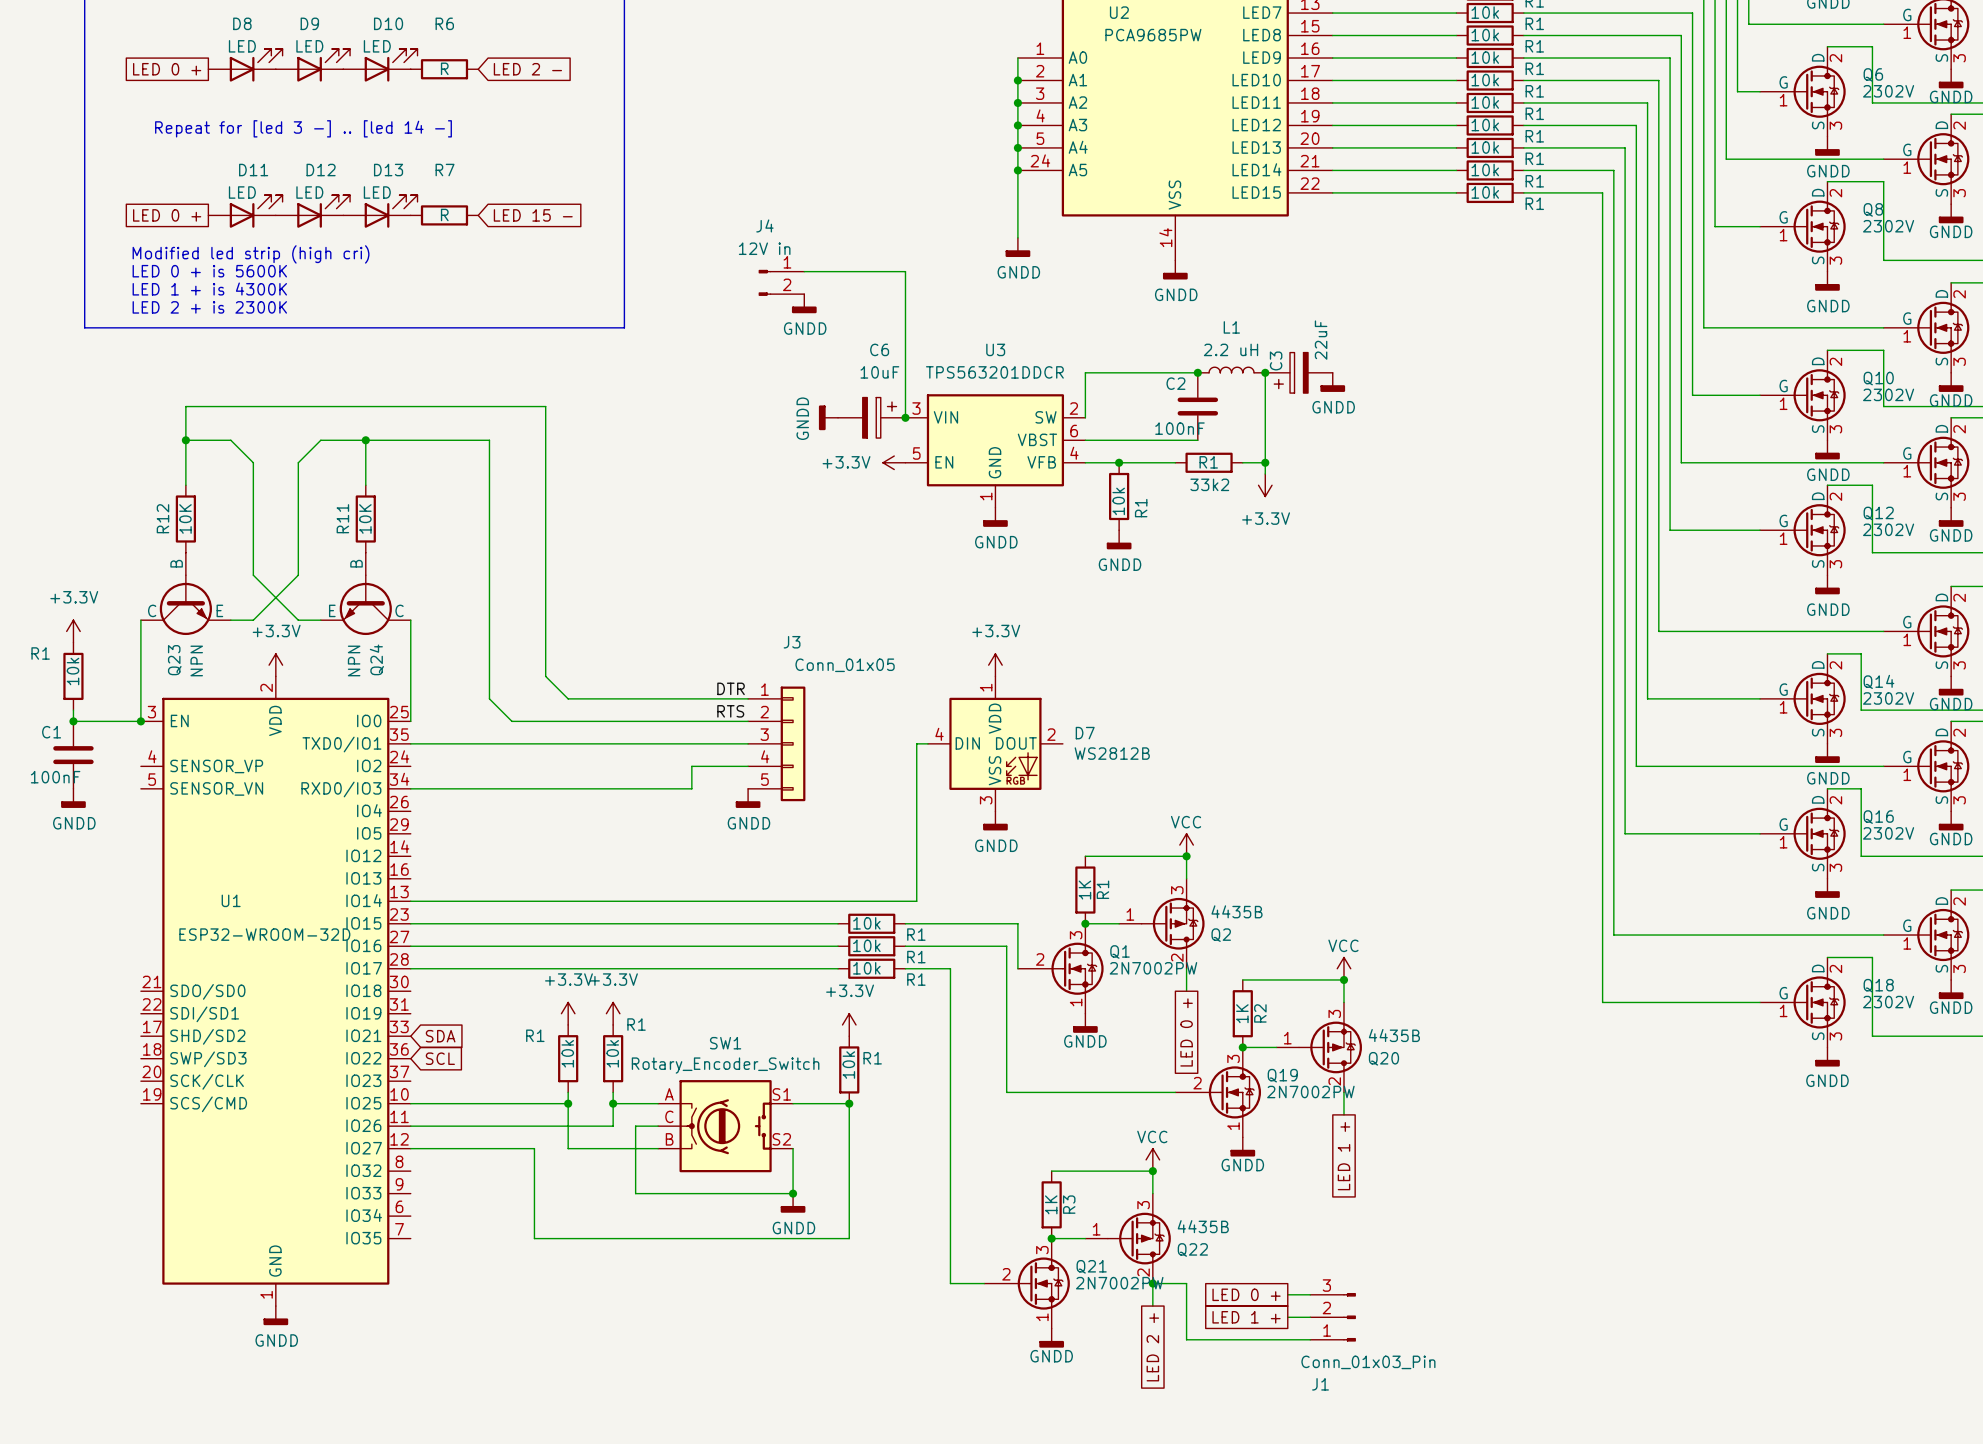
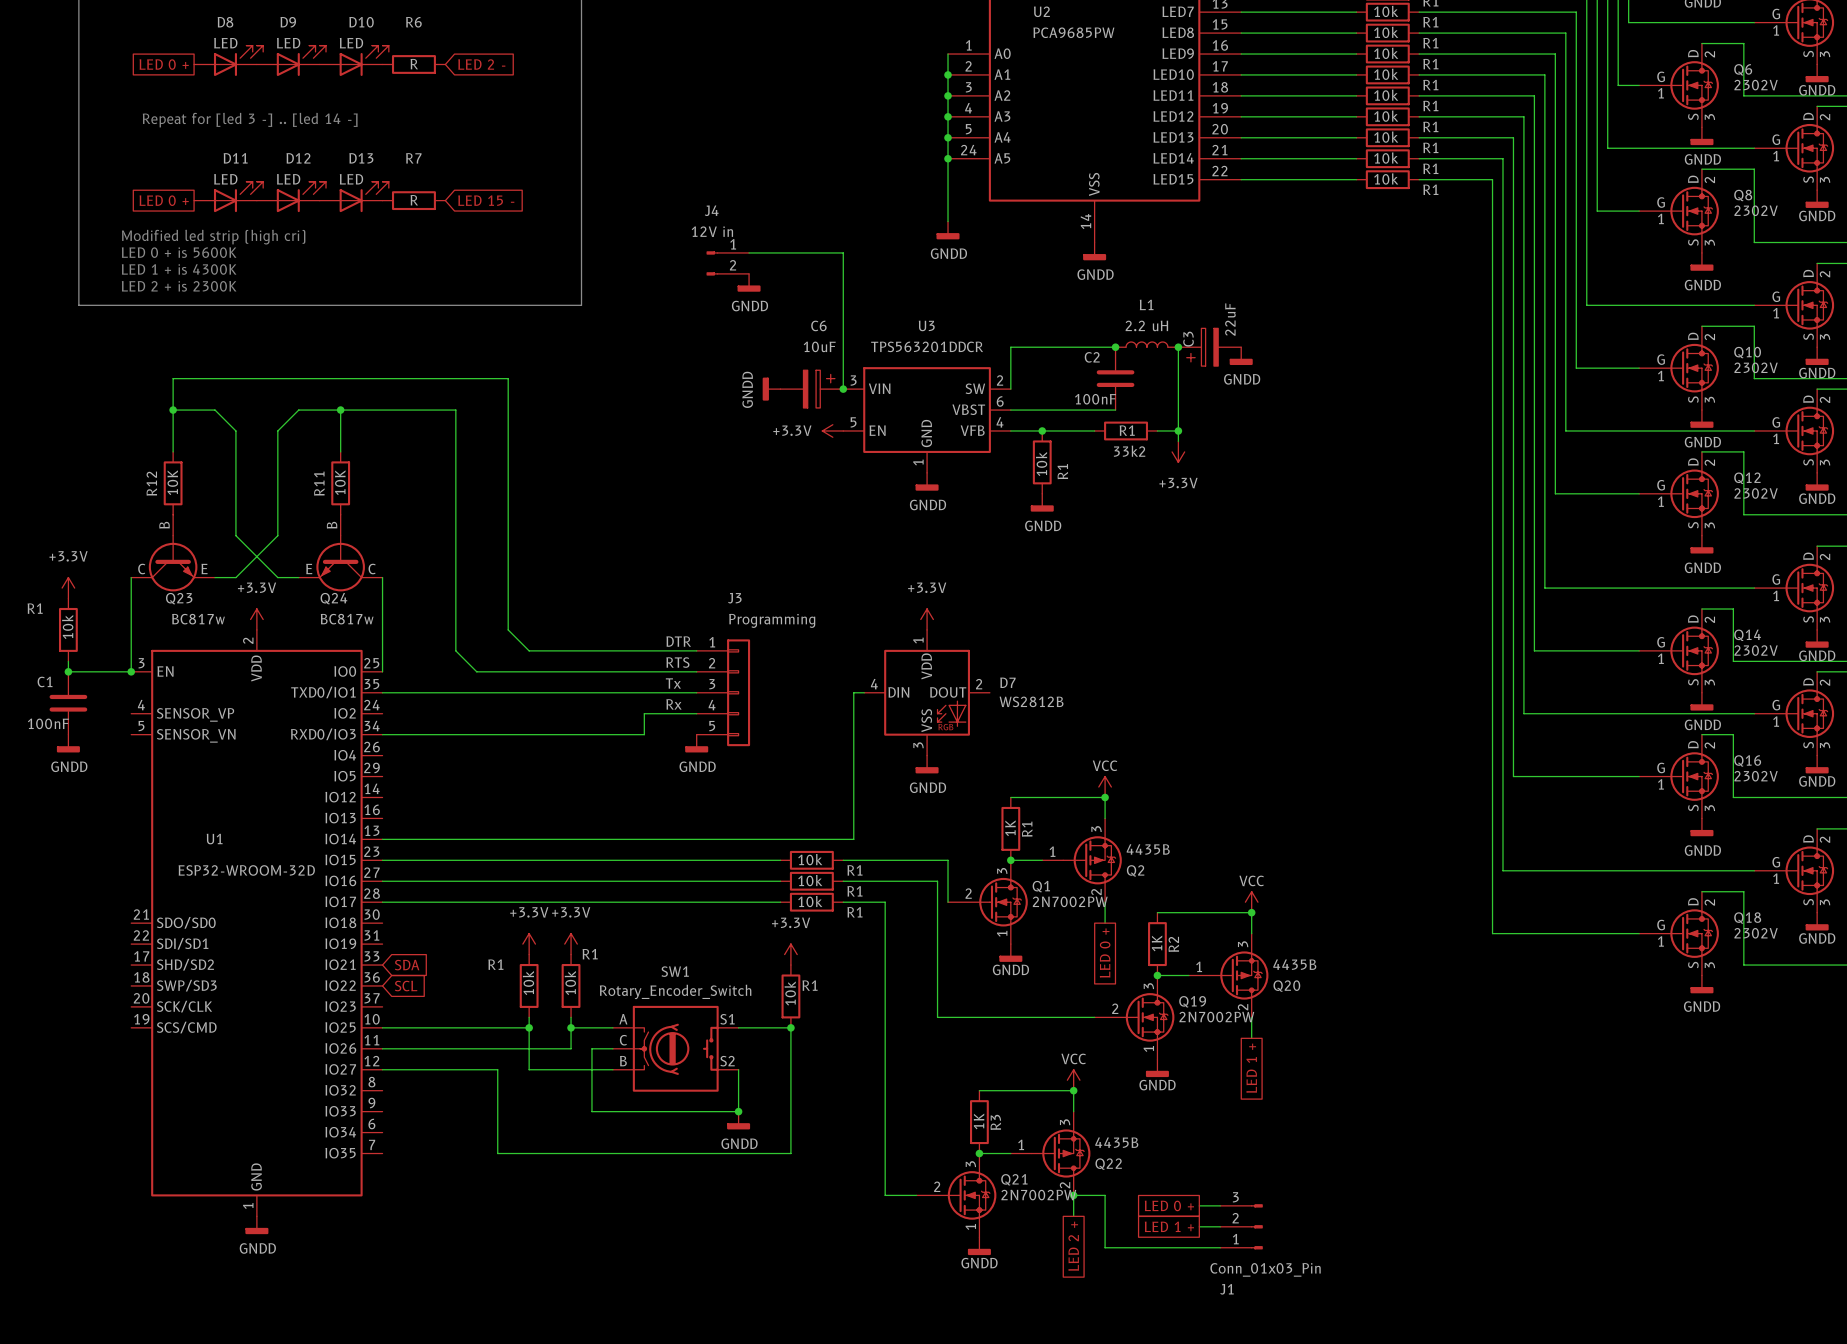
Q24 name rotation: 0° (376, 659) -> 90° clockwise (333, 598)
Q23 name rotation: 0° (174, 660) -> 90° clockwise (179, 598)
Q23 value: NPN (196, 660) -> BC817w (198, 619)
Q24 value: NPN (354, 660) -> BC817w (347, 619)
J3 value: Conn_01x05 (845, 665) -> Programming (772, 620)
label: none -> Tx (673, 683)
label: none -> Rx (673, 704)

